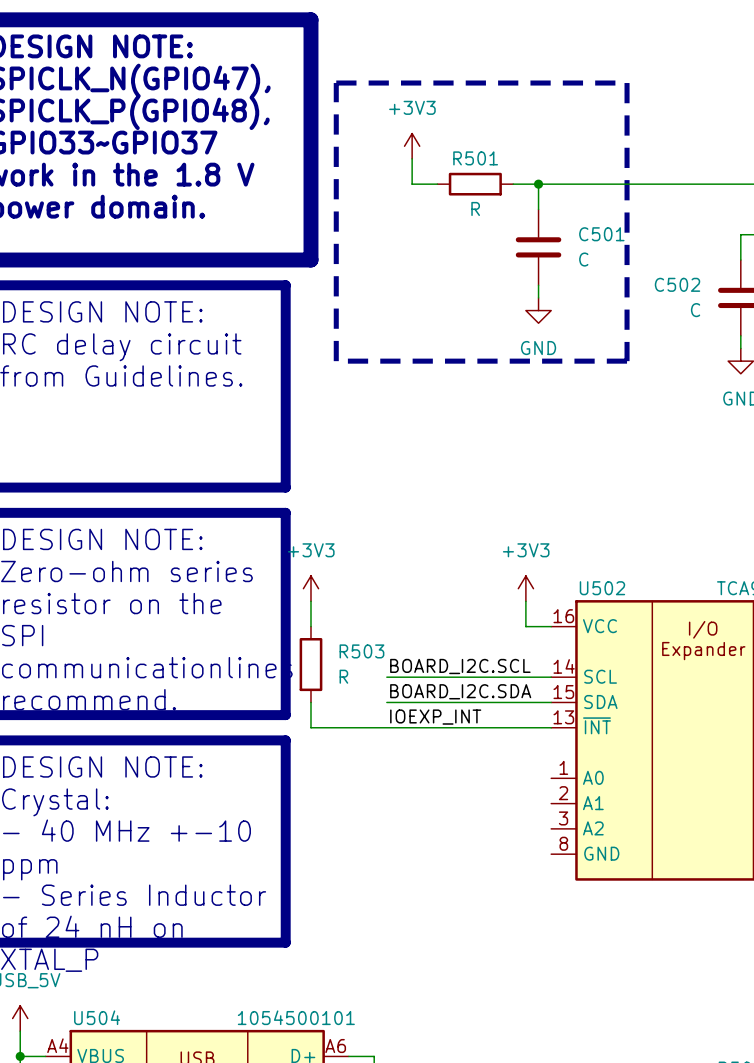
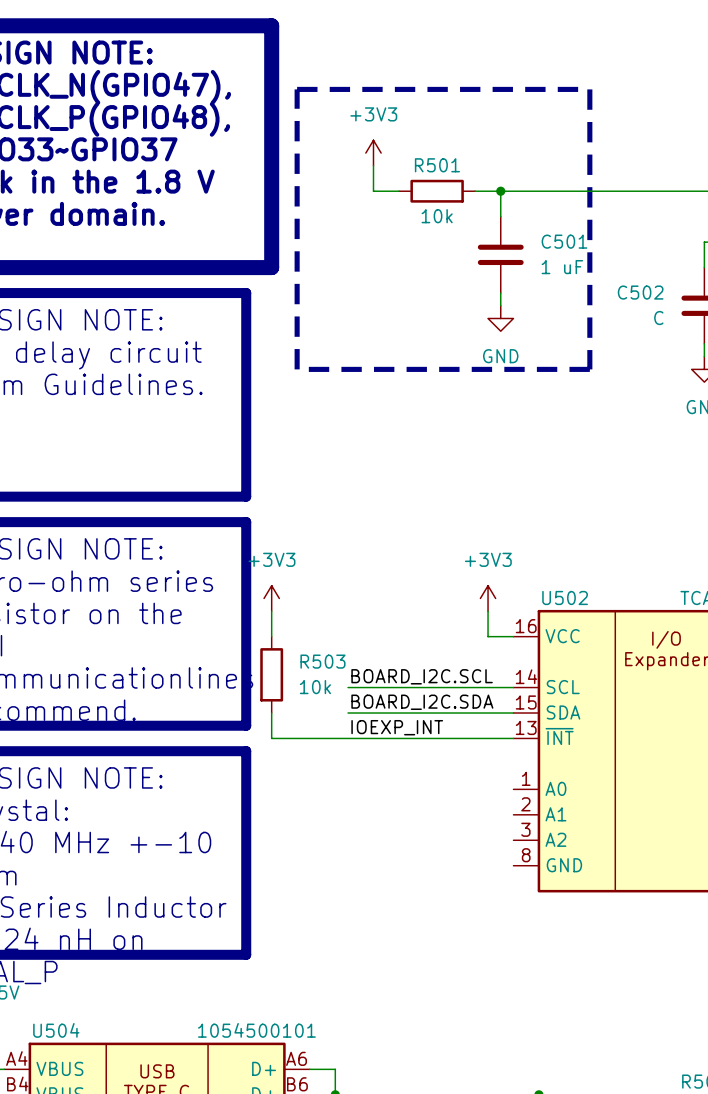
R501 value: R (475, 208) -> 10k (437, 216)
C501 value: C (583, 259) -> 1 uF (562, 267)
R503 value: R (343, 676) -> 10k (315, 687)

